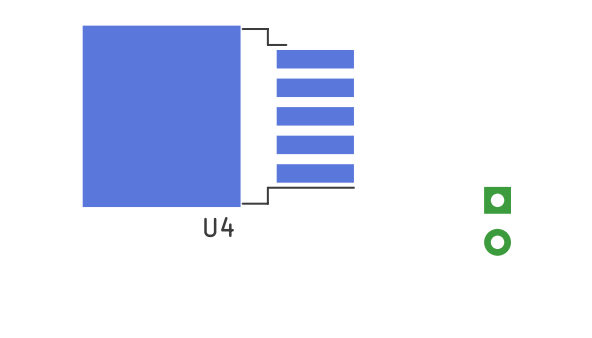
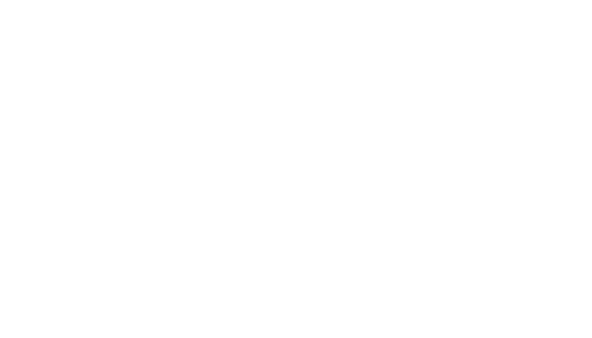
U4: (218, 116) -> none
part: (497, 221) -> none

